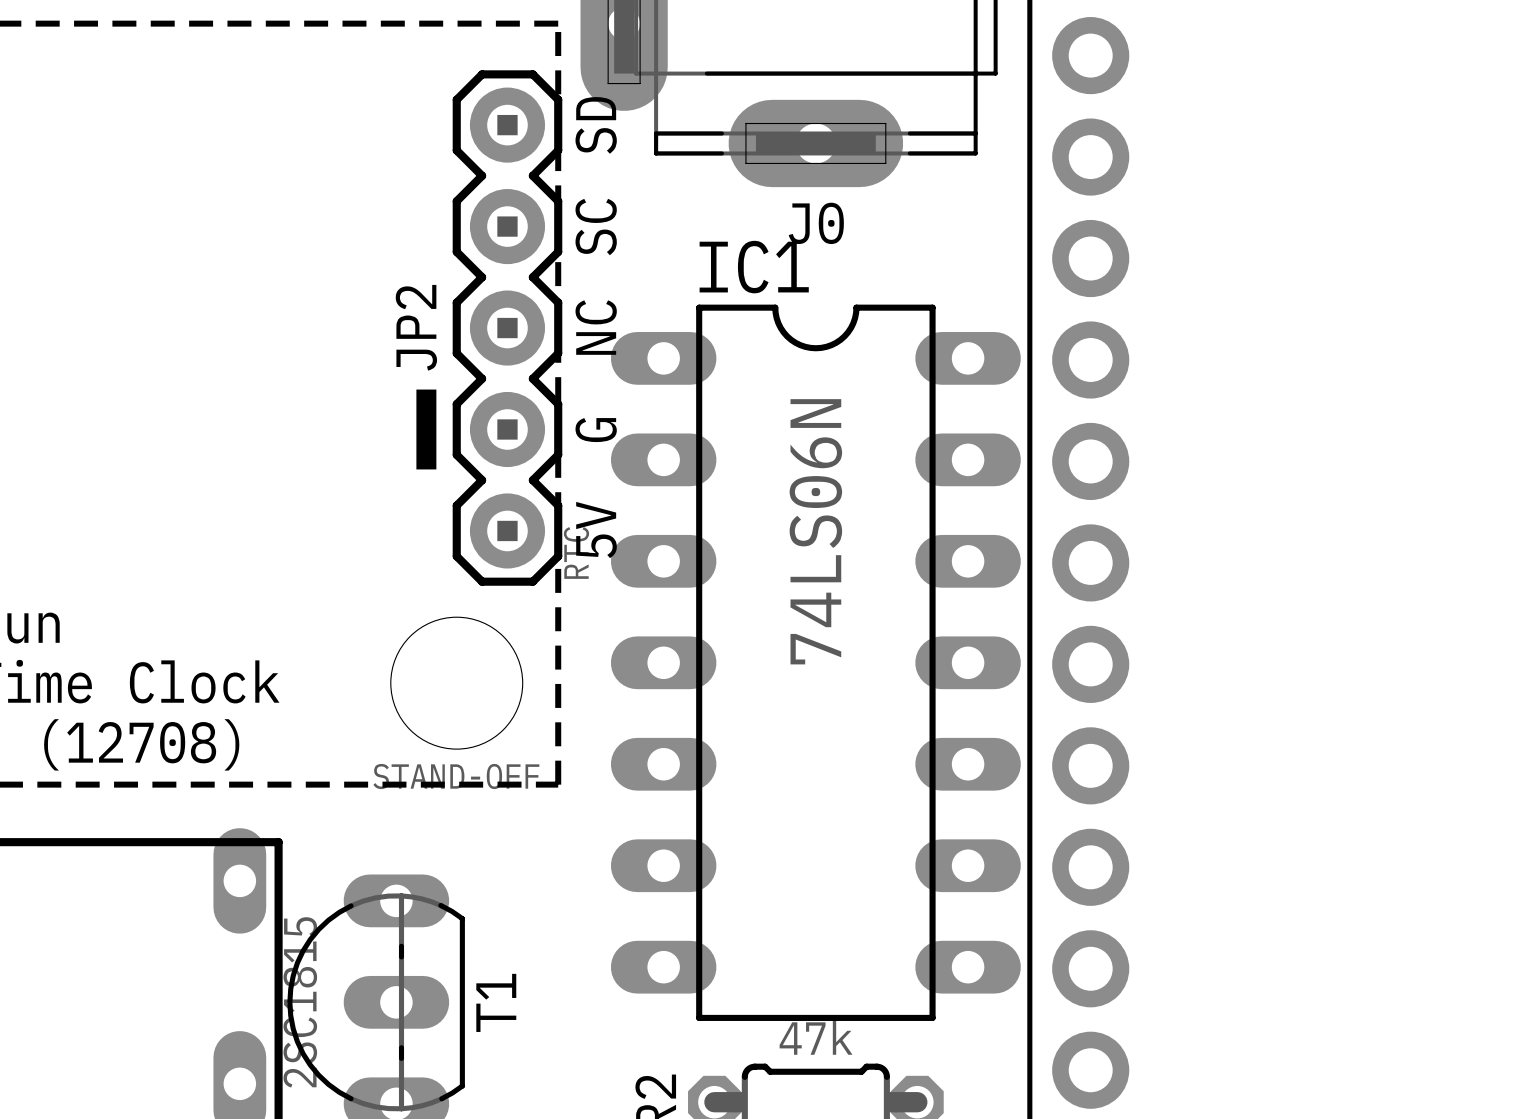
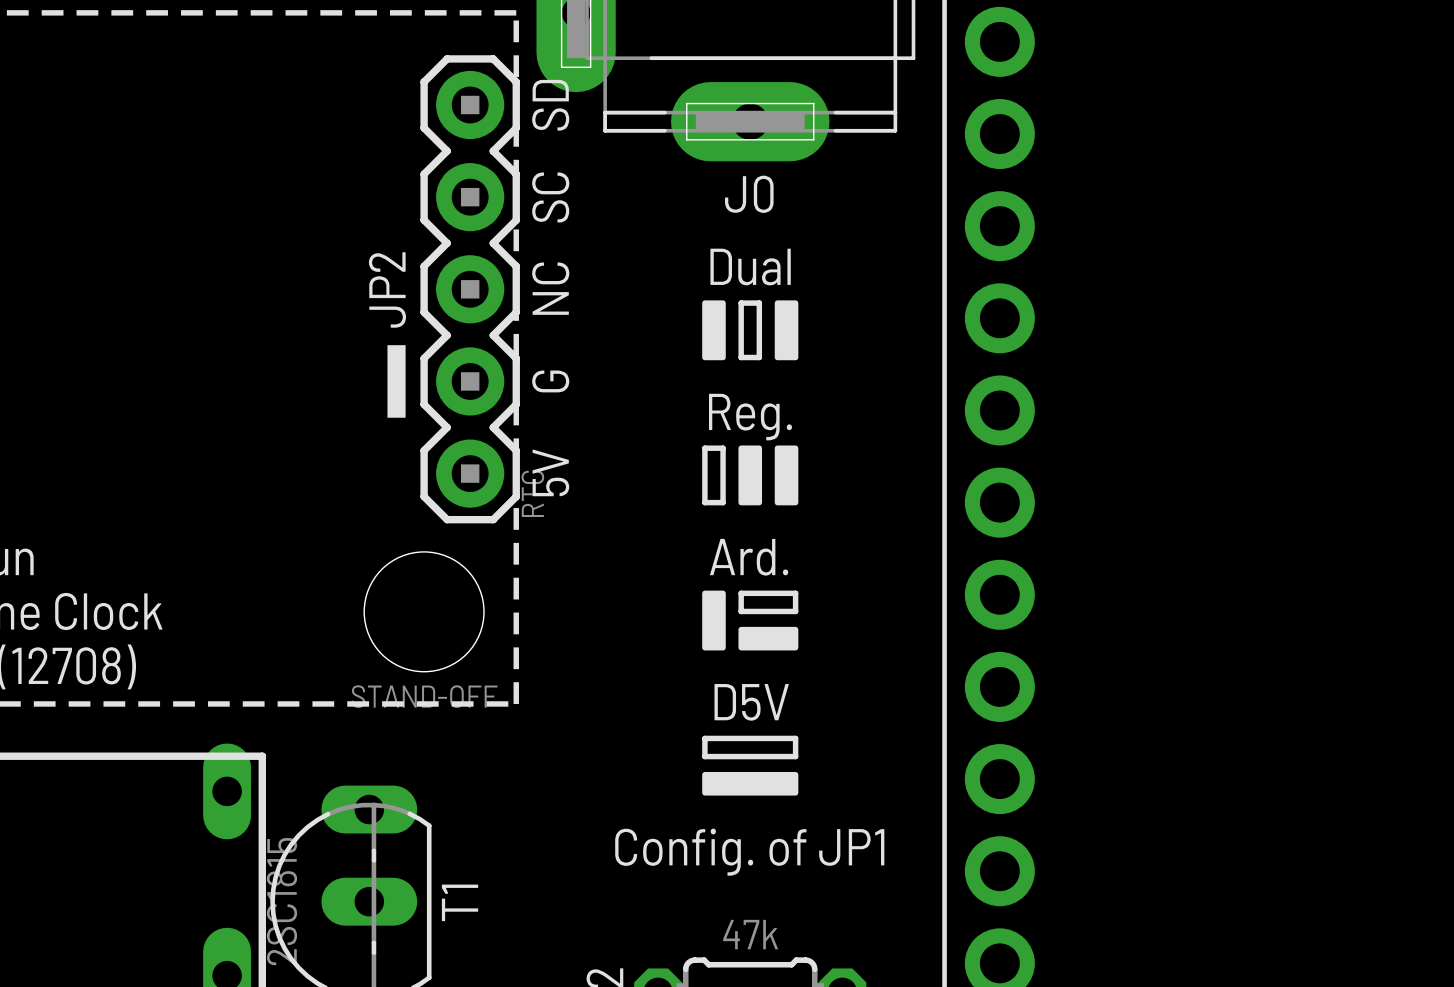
text: none -> Dual (750, 267)
drawing: none -> [702, 300, 726, 361]
drawing: none -> [774, 300, 799, 361]
line: none -> (741, 303) (759, 303) (759, 357) (741, 357) (741, 303)
text: none -> Reg. (750, 417)
drawing: none -> [738, 445, 799, 506]
line: none -> (704, 448) (704, 502) (723, 502) (723, 448) (704, 448)
text: none -> Ard. (749, 557)
drawing: none -> [702, 590, 799, 651]
line: none -> (741, 593) (741, 611) (795, 611) (795, 593) (741, 593)
IC1: 74LS06N (815, 662) -> none
text: none -> D5V (751, 702)
line: none -> (704, 738) (704, 756) (795, 756) (795, 738) (704, 738)
drawing: none -> [702, 771, 799, 796]
text: none -> Config. of JP1 (749, 852)

